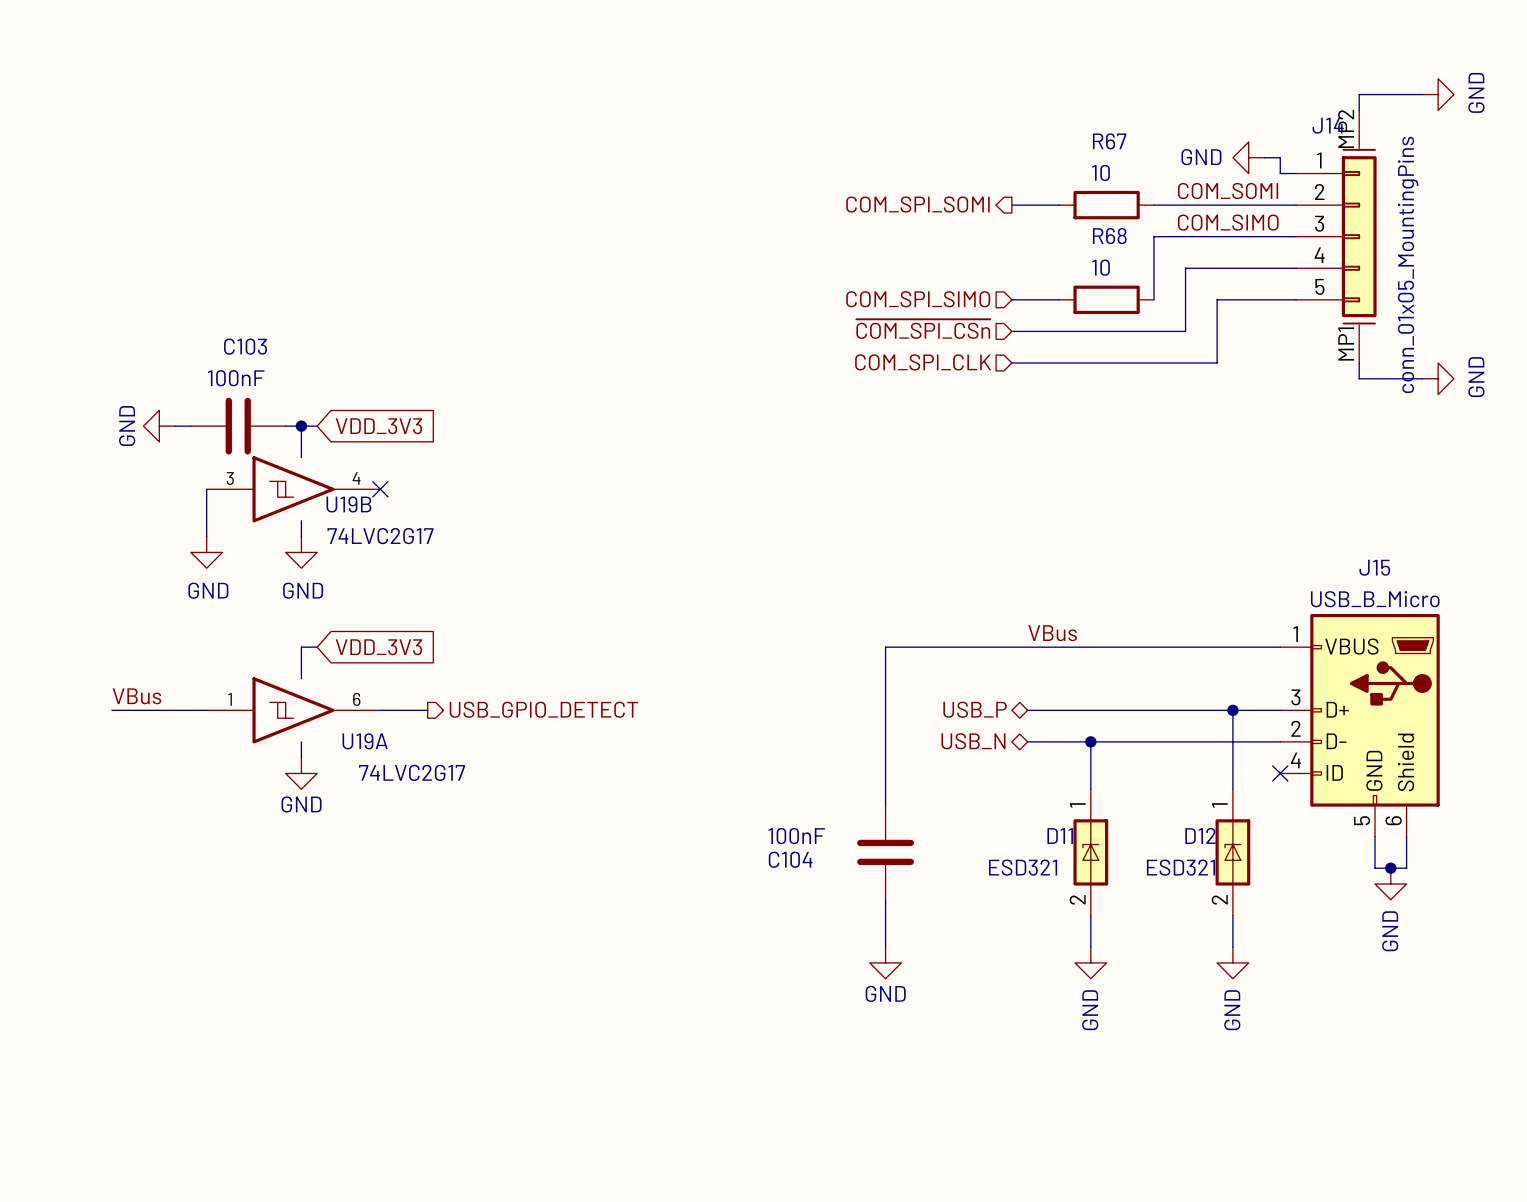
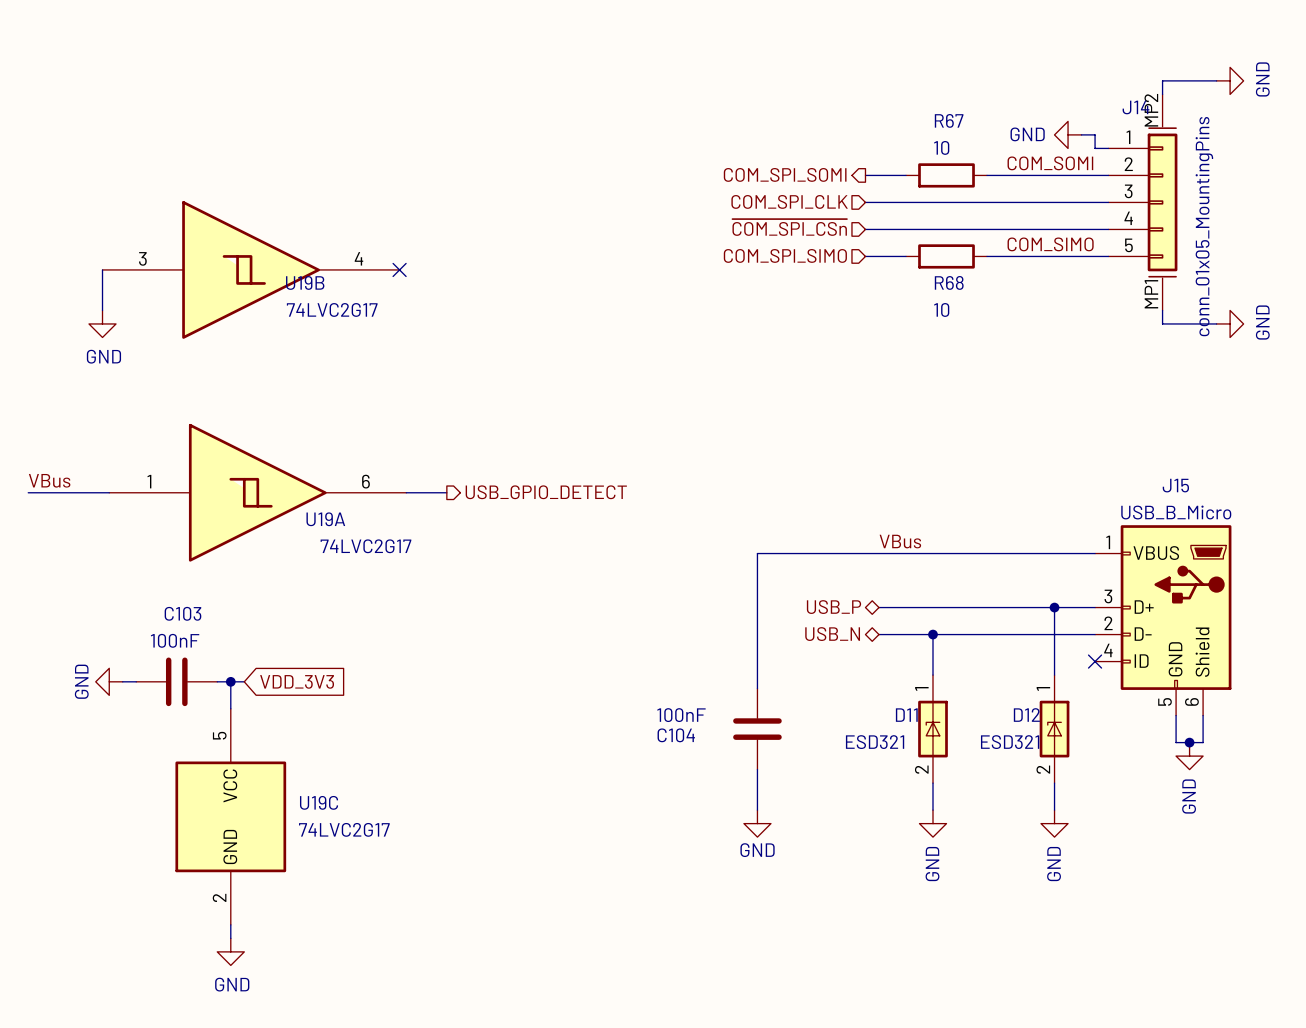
label position: COM_SIMO (1228, 222) -> COM_SIMO (1050, 244)
wire: none -> (865, 202) (987, 202)
R68 name position: R68 (1109, 236) -> R68 (949, 282)
wire: (1153, 236) (1153, 299) -> (1041, 256) (987, 256)
R68 value position: 10 (1100, 267) -> 10 (941, 309)
wire: (1185, 268) (1185, 331) (1011, 331) -> (1014, 229) (865, 229)
wire: (1217, 299) (1217, 362) (1011, 362) -> none
no-connect mark: none -> (399, 269)
hierarchical label position: ~{COM_SPI_CSn} (923, 329) -> ~{COM_SPI_CSn} (789, 227)
hierarchical label position: COM_SPI_CLK (923, 362) -> COM_SPI_CLK (789, 201)
power symbol rotation: 0° (159, 426) -> 90° counterclockwise (102, 323)
power symbol position: GND (159, 426) -> GND (102, 323)
wire: (175, 426) (190, 426) -> none
C103 position: (238, 426) -> (176, 681)
wire: (285, 426) (317, 426) -> none
wire: (301, 426) (301, 457) -> none
junction: (301, 426) -> none
global label: VDD_3V3 (378, 426) -> none
U19B symbol: [206, 456, 381, 523] -> [102, 201, 400, 339]
wire: (206, 489) (206, 536) -> (102, 269) (102, 310)
no-connect mark: (380, 489) -> none
wire: (301, 520) (301, 536) -> none
power symbol: GND (206, 552) -> none
power symbol: GND (301, 552) -> none
wire: (317, 647) (301, 647) (301, 678) -> none
global label position: VDD_3V3 (378, 647) -> VDD_3V3 (297, 681)
U19A symbol: [206, 677, 381, 744] -> [109, 423, 407, 562]
label position: VBus (136, 696) -> VBus (49, 480)
hierarchical label position: USB_GPIO_DETECT (543, 709) -> USB_GPIO_DETECT (546, 492)
wire: (111, 710) (206, 710) -> (28, 492) (109, 492)
wire: (380, 710) (427, 710) -> (406, 492) (446, 492)
wire: (301, 741) (301, 757) -> none
power symbol: GND (301, 773) -> none
power symbol: none -> GND (109, 681)
wire: none -> (122, 681) (136, 681)
wire: none -> (217, 681) (244, 681)
wire: none -> (230, 681) (230, 708)
junction: none -> (230, 681)
U19C: none -> 74LVC2G17 (230, 816)
wire: none -> (230, 924) (230, 938)
power symbol: none -> GND (230, 951)

